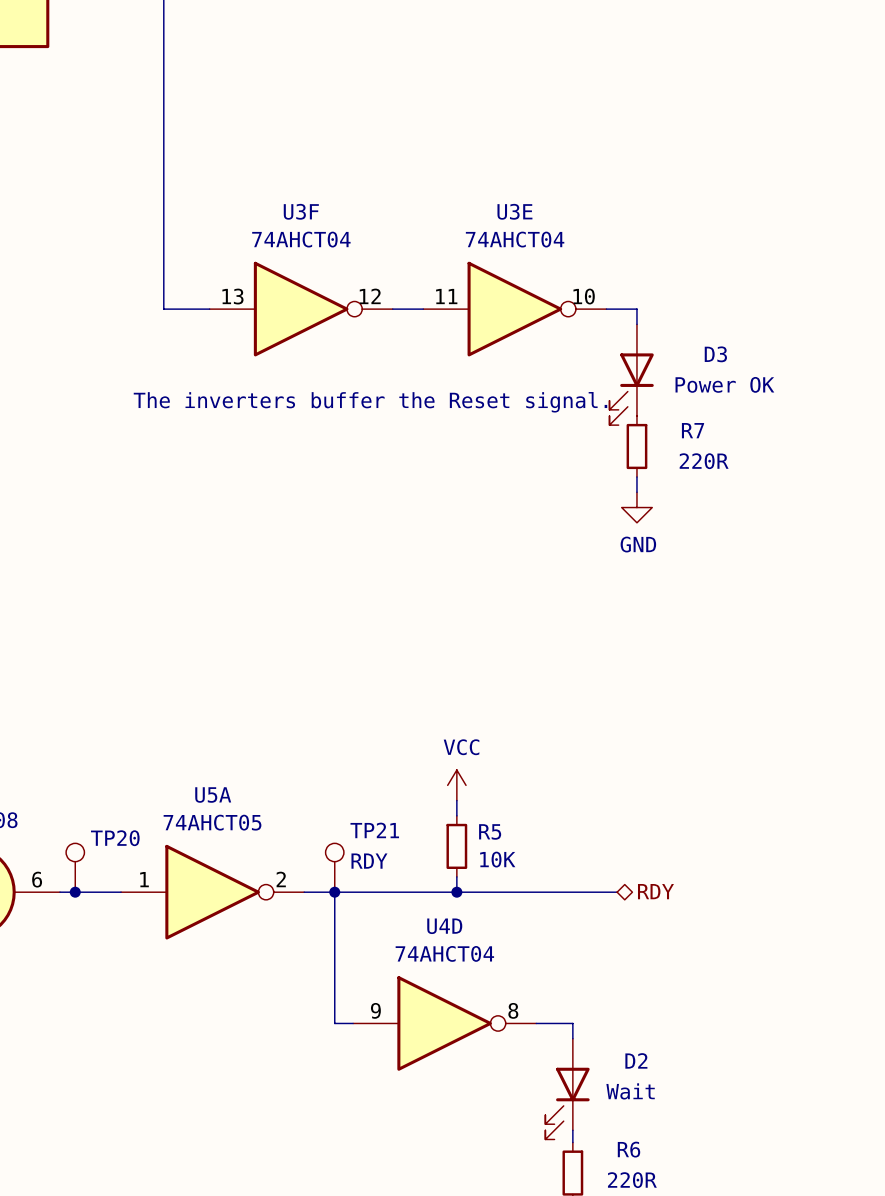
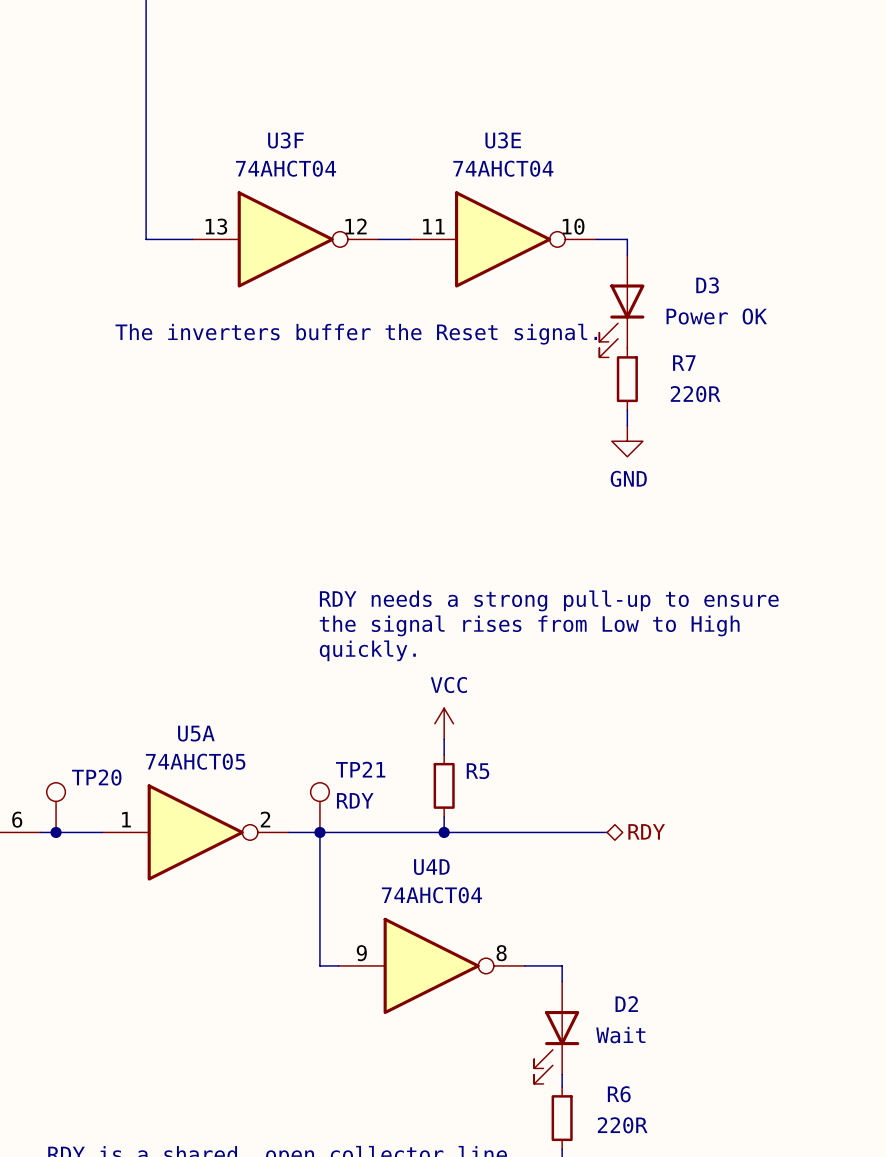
text: none -> RDY needs a strong pull-up to ensure (549, 600)
text: none -> the signal rises from Low to High (529, 625)
text: none -> quickly. (367, 650)
R5 value: 10K (497, 859) -> none

